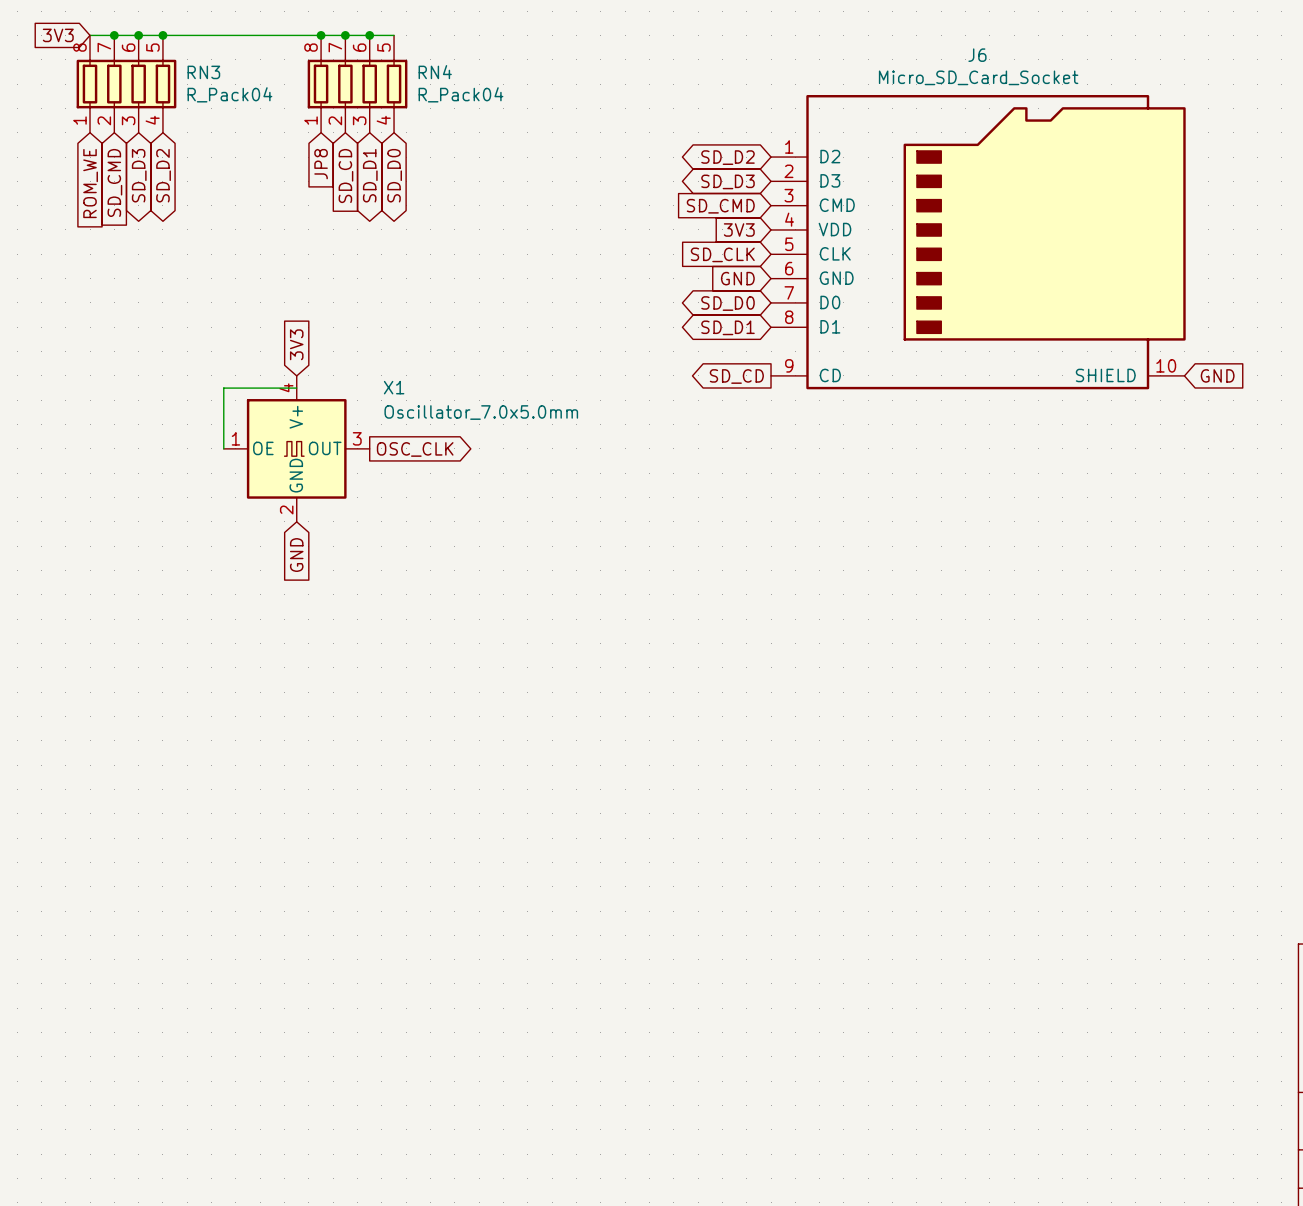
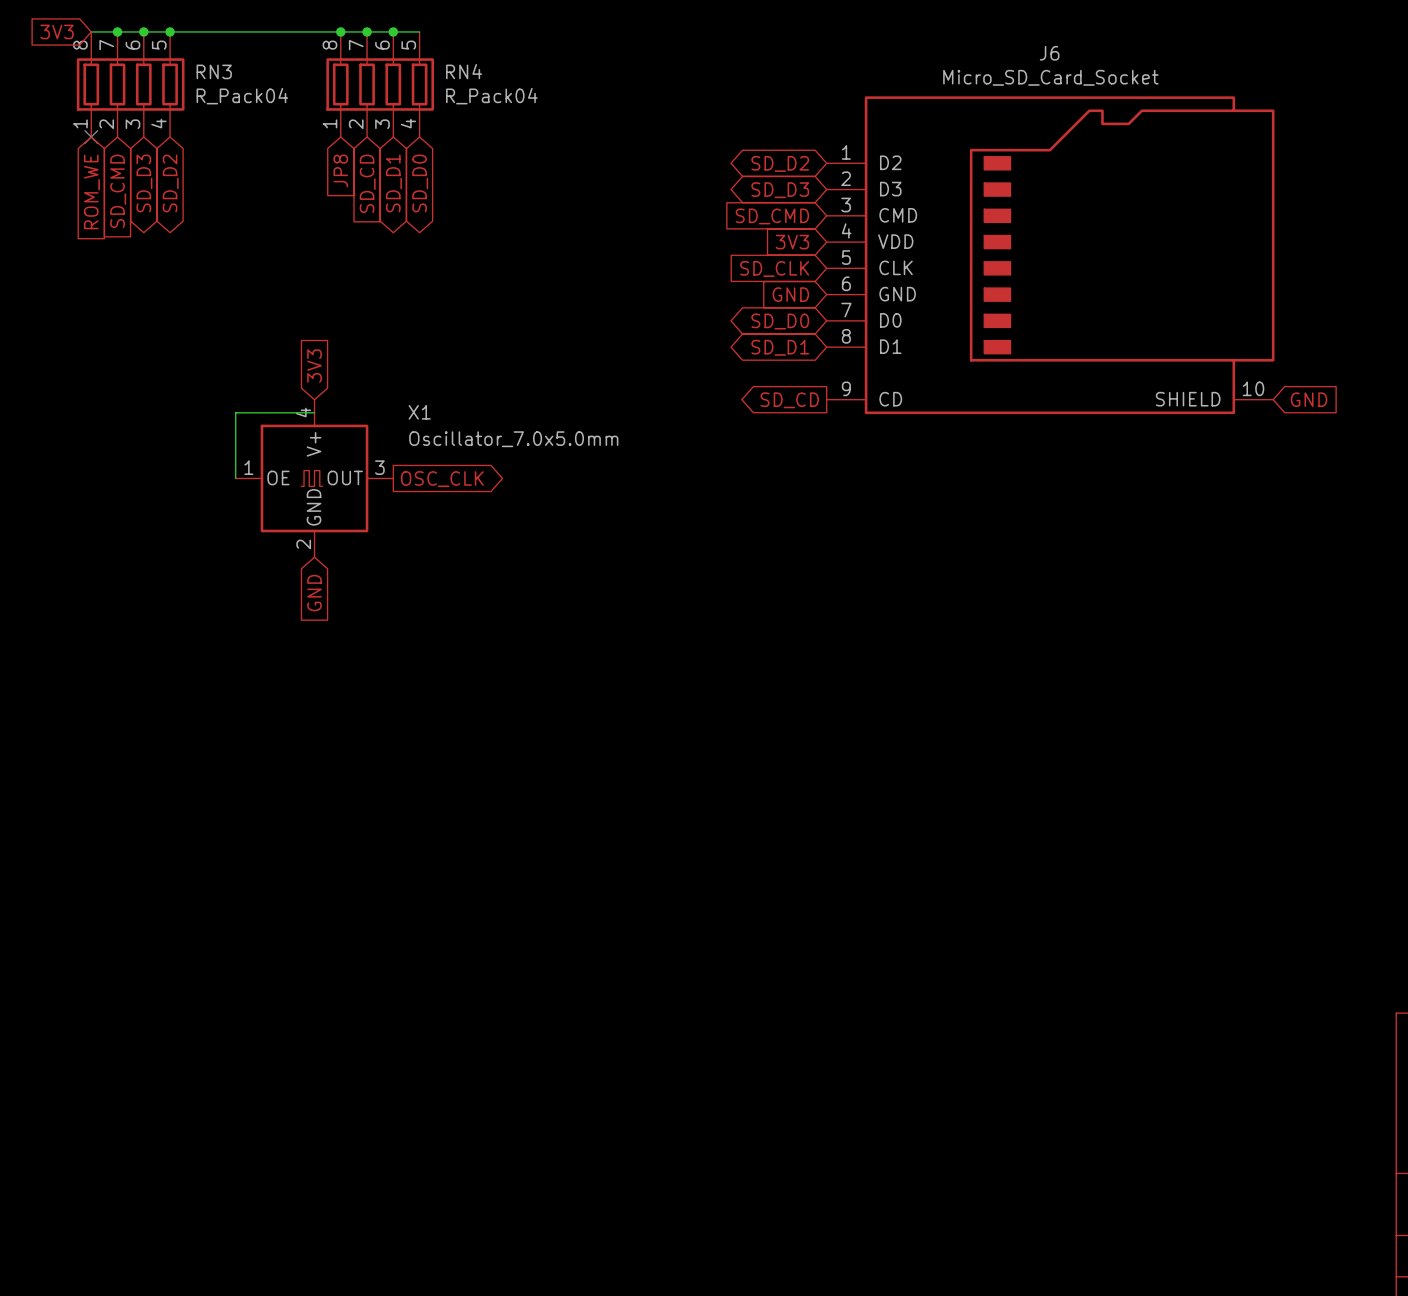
no-connect mark: none -> (91, 137)

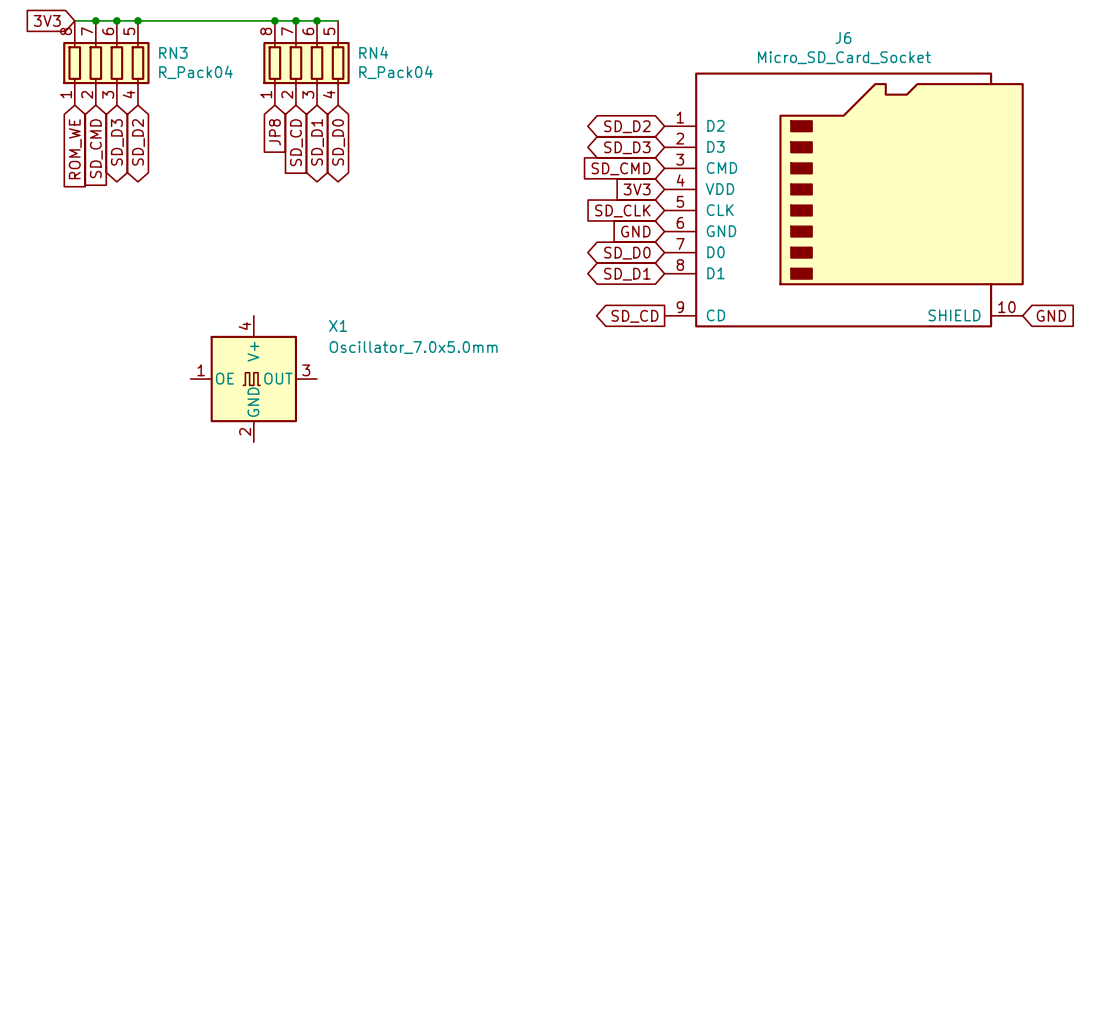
no-connect mark: (91, 137) -> none
global label: 3V3 (314, 366) -> none
wire: (314, 412) (235, 412) (235, 478) -> none
global label: OSC_CLK (442, 479) -> none
global label: GND (314, 593) -> none

